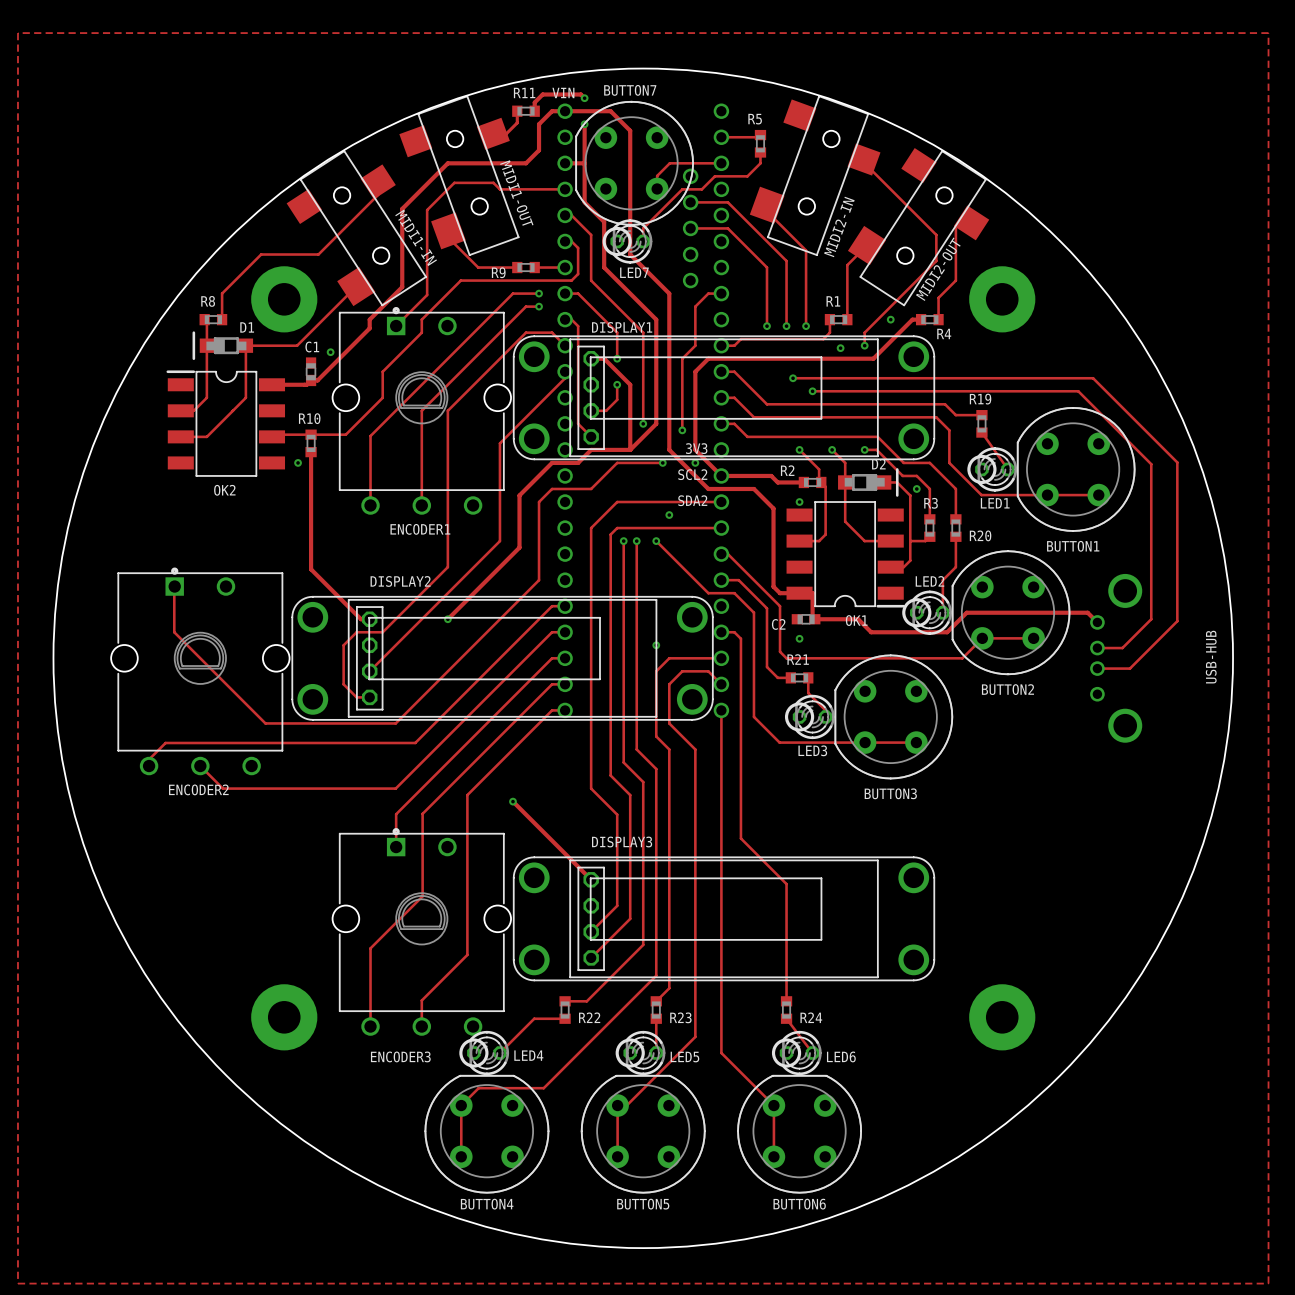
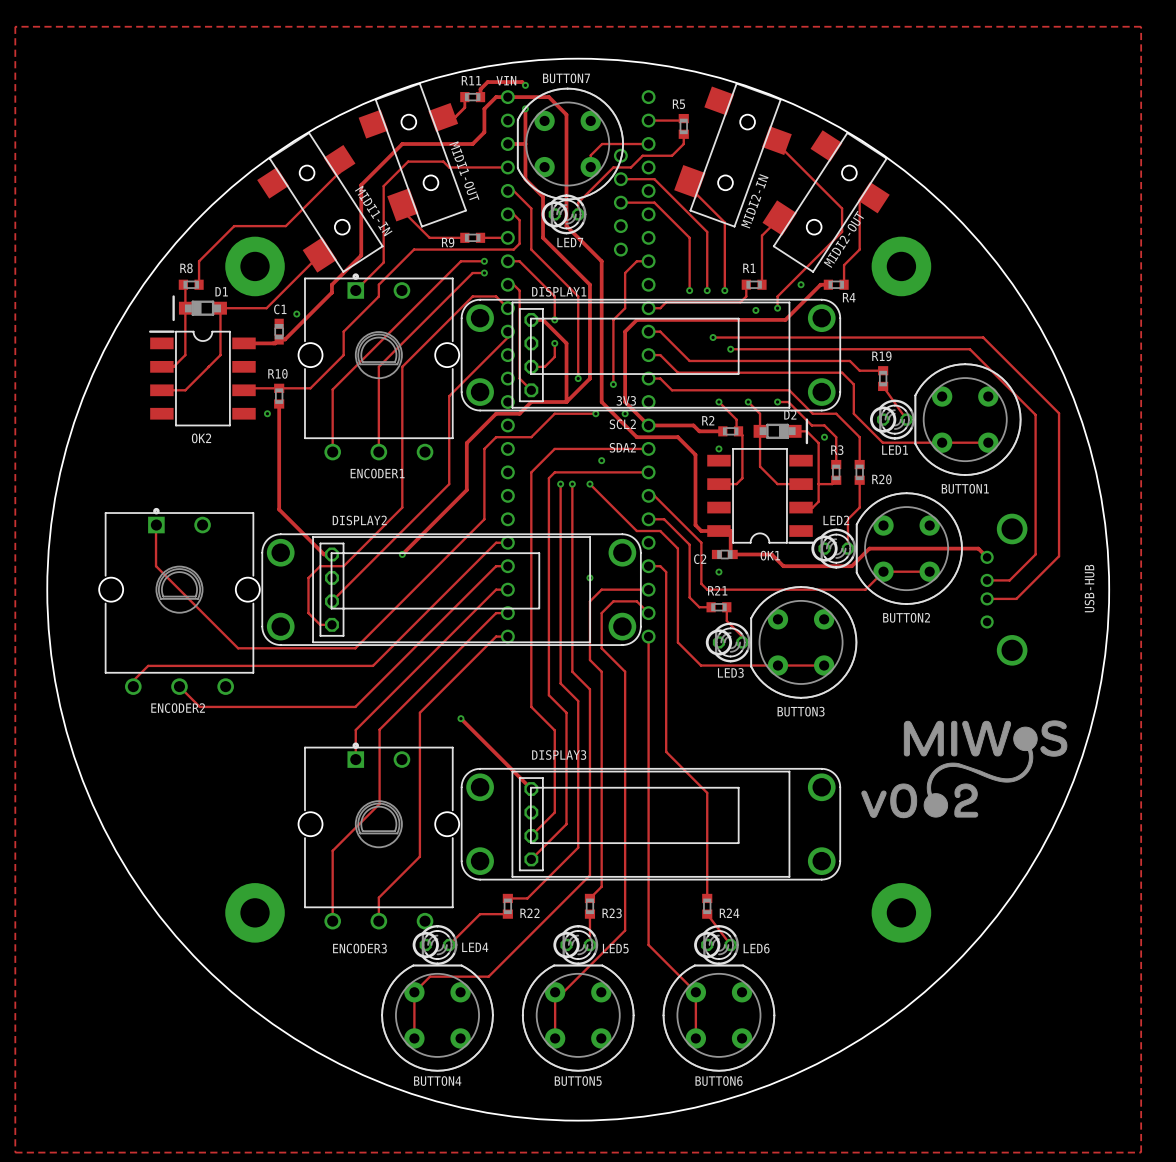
drawing: none -> [861, 720, 1068, 819]

